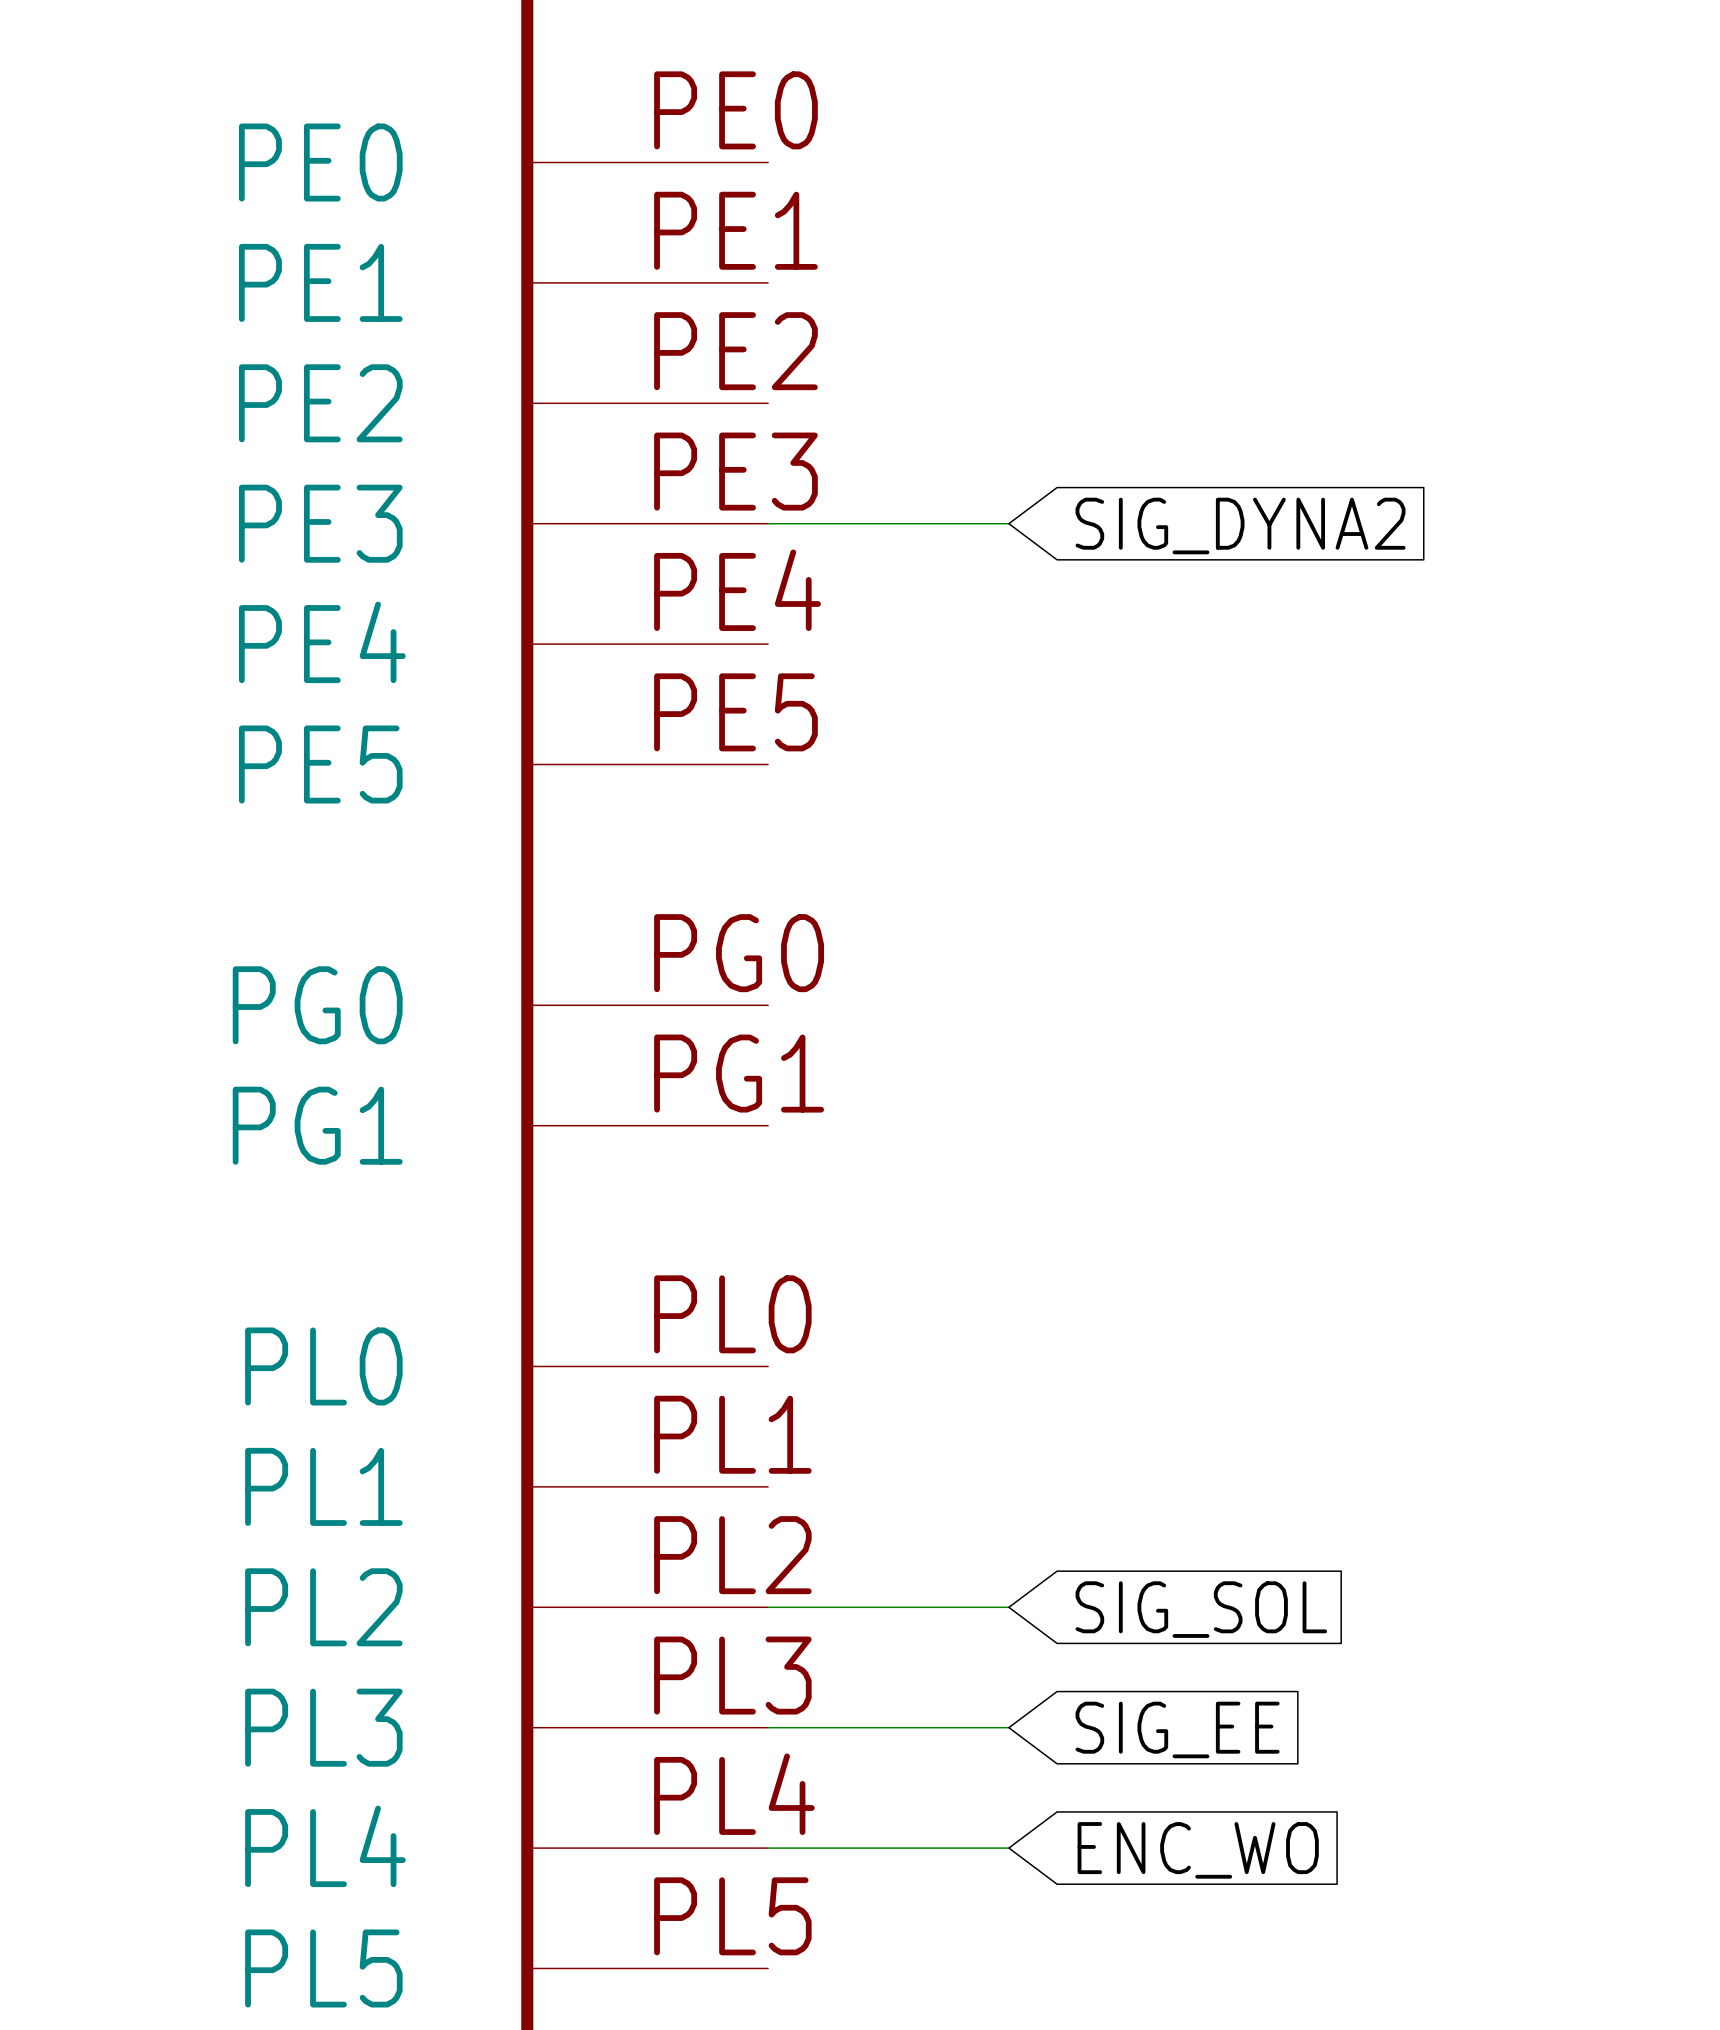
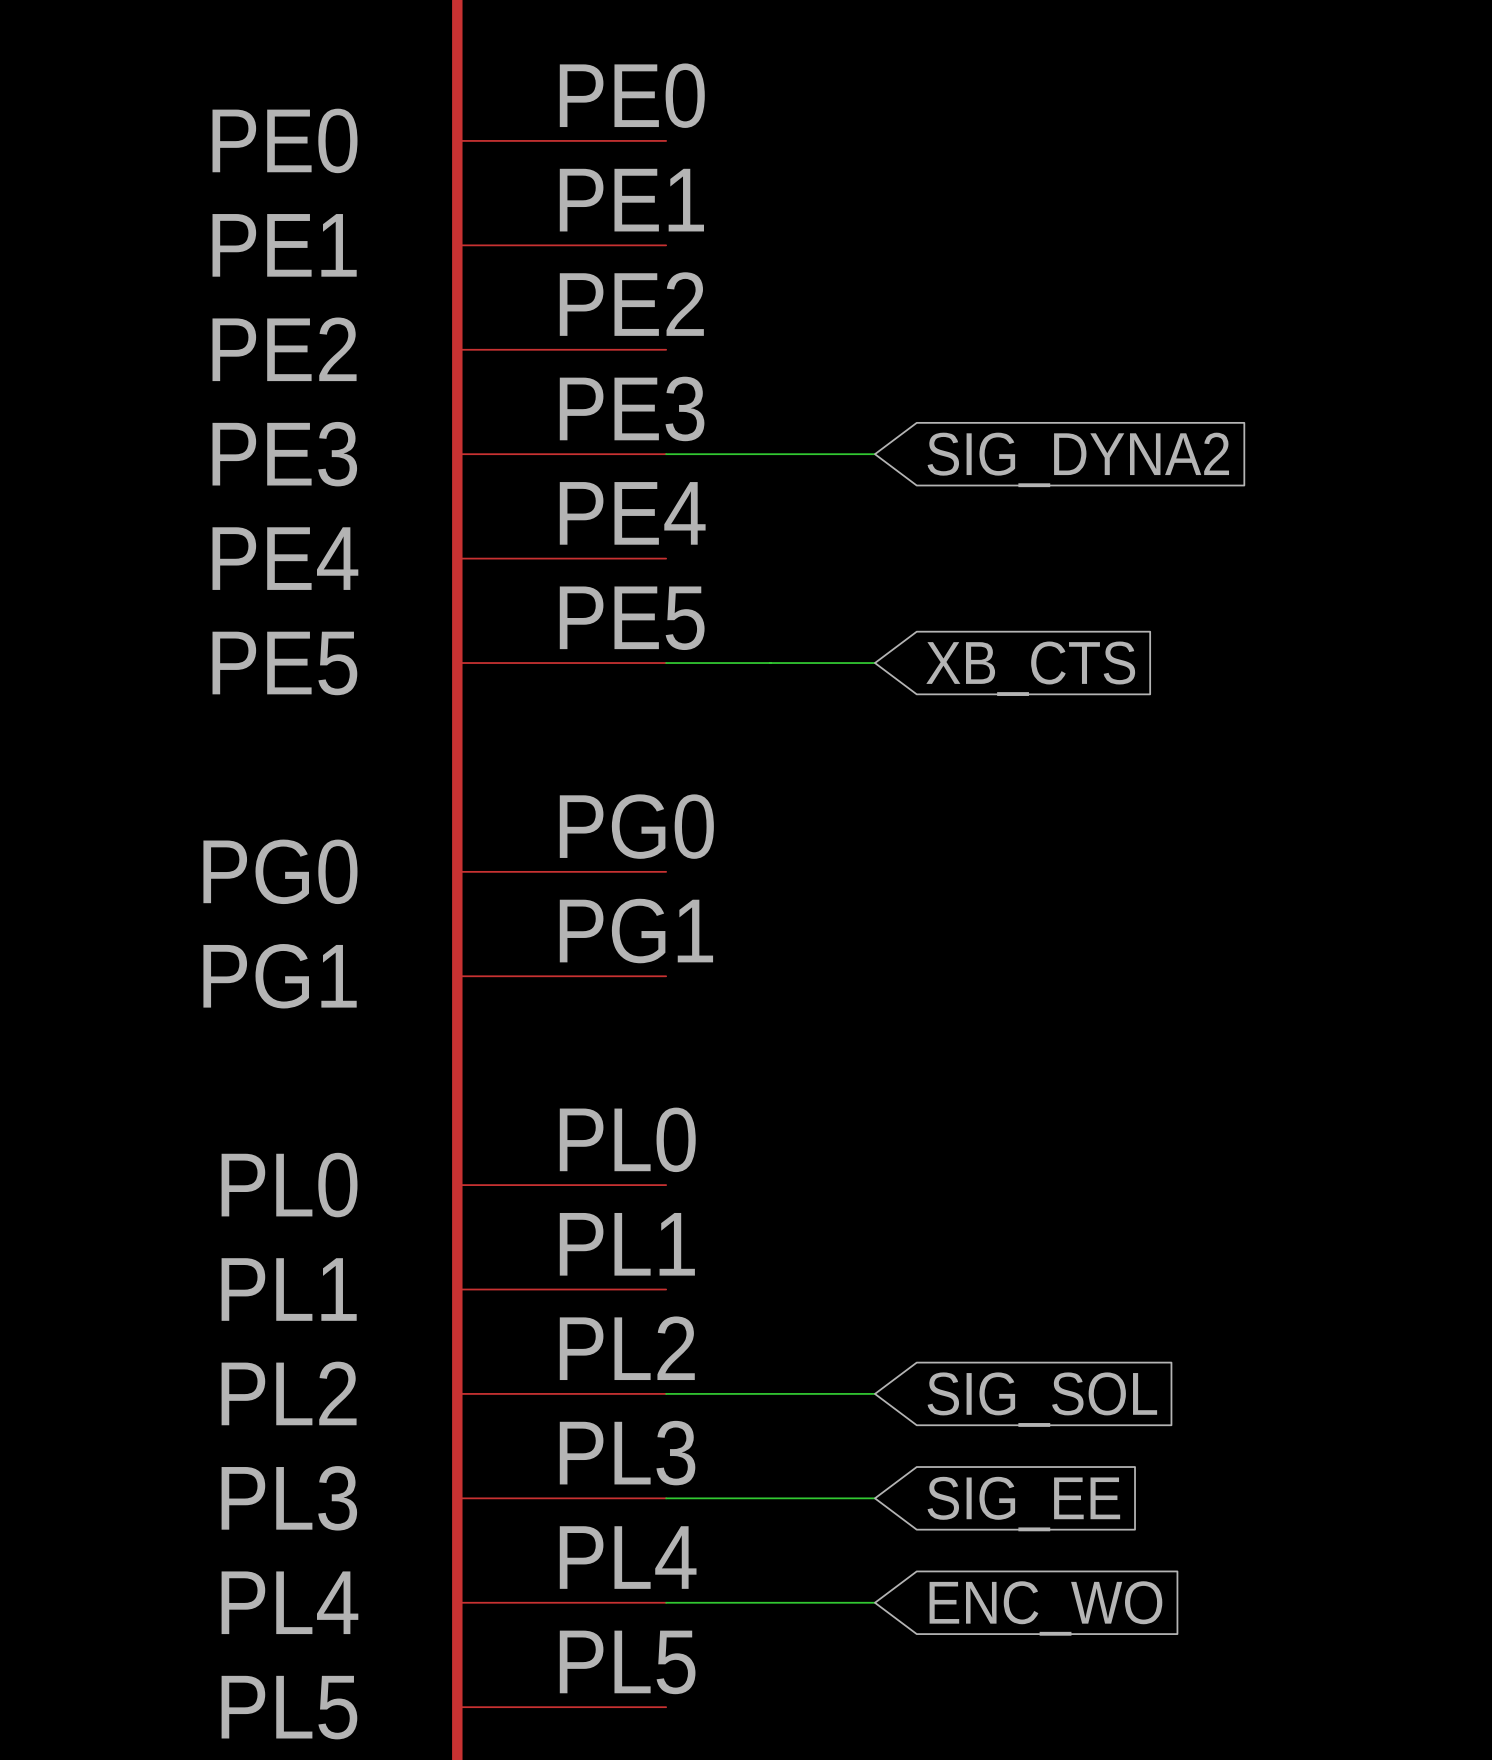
wire: none -> (666, 663) (874, 663)
global label: none -> XB_CTS (1030, 668)

